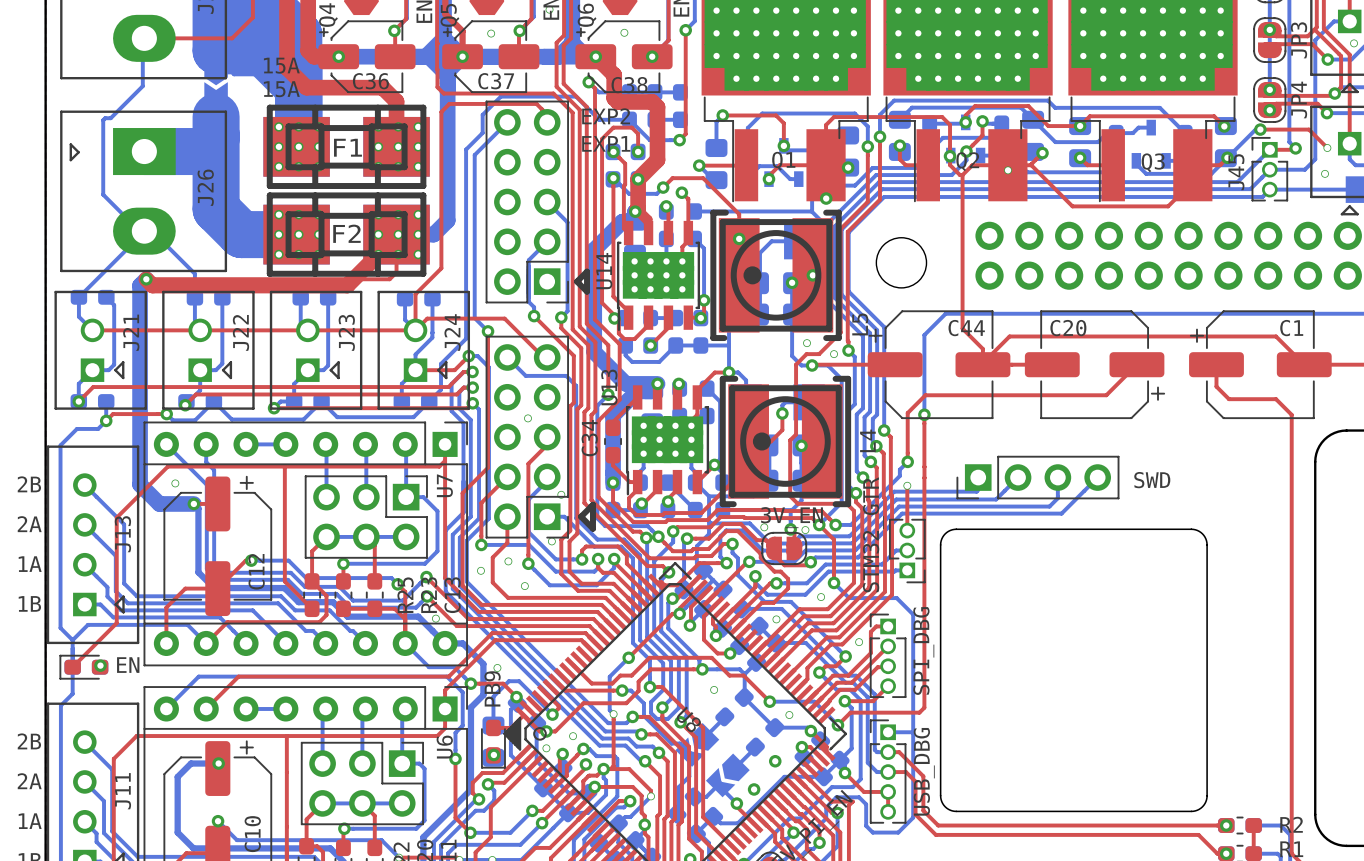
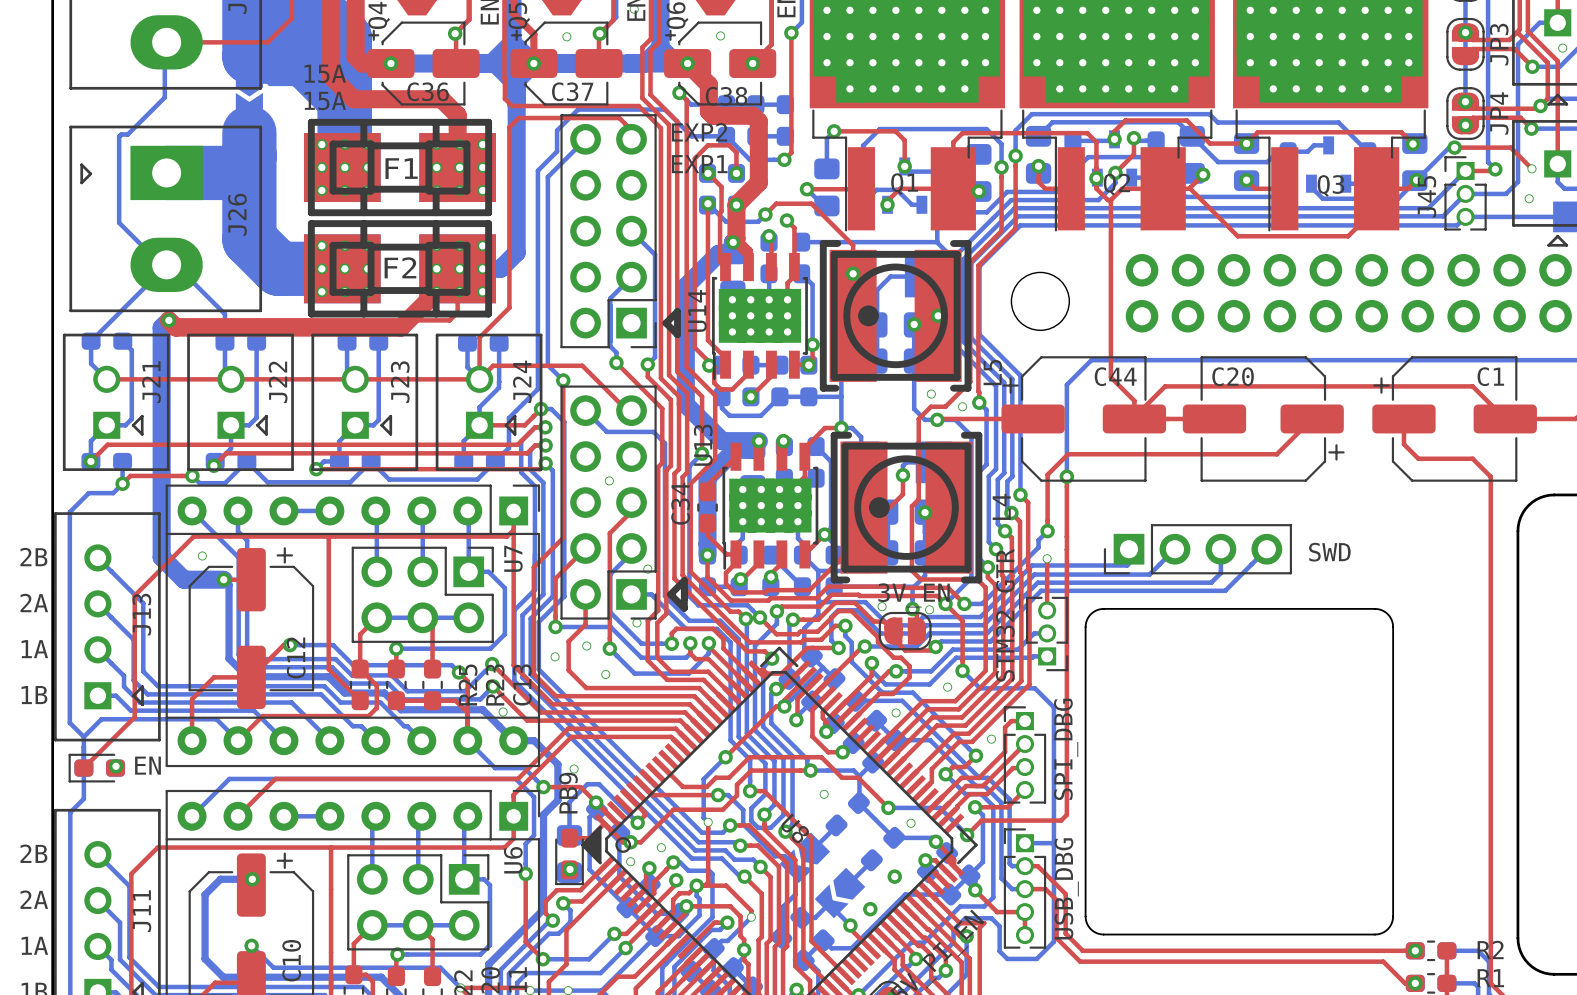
via: (1008, 170) -> none
via: (826, 198) -> none

